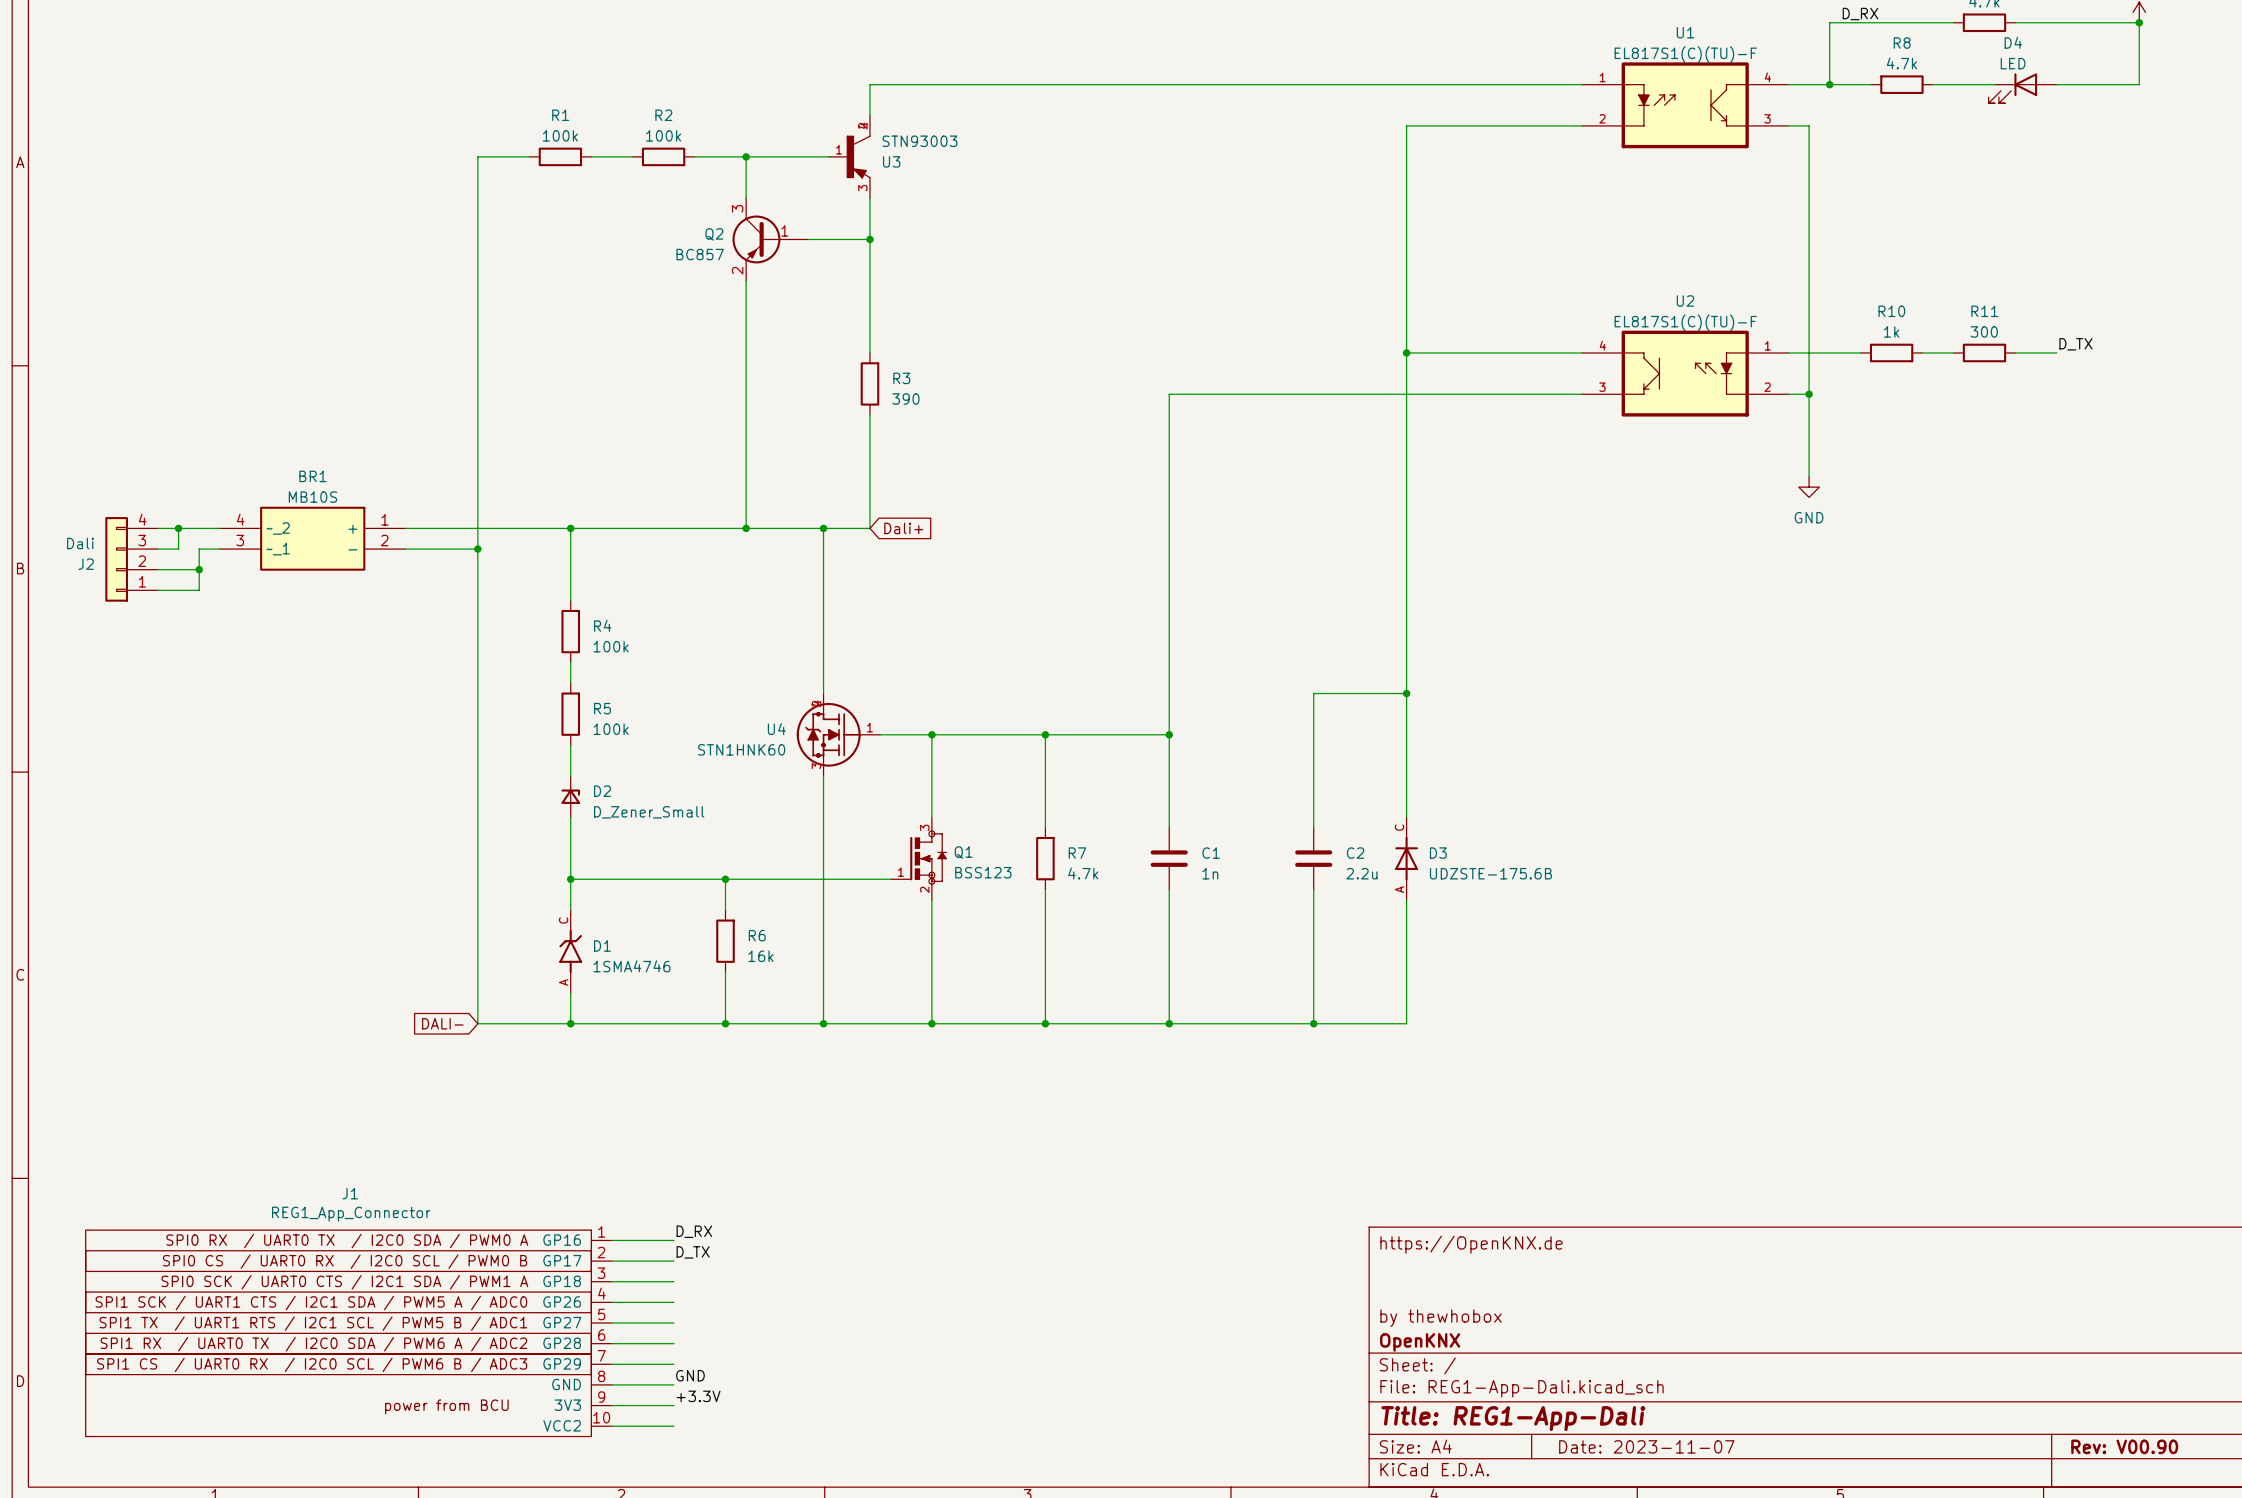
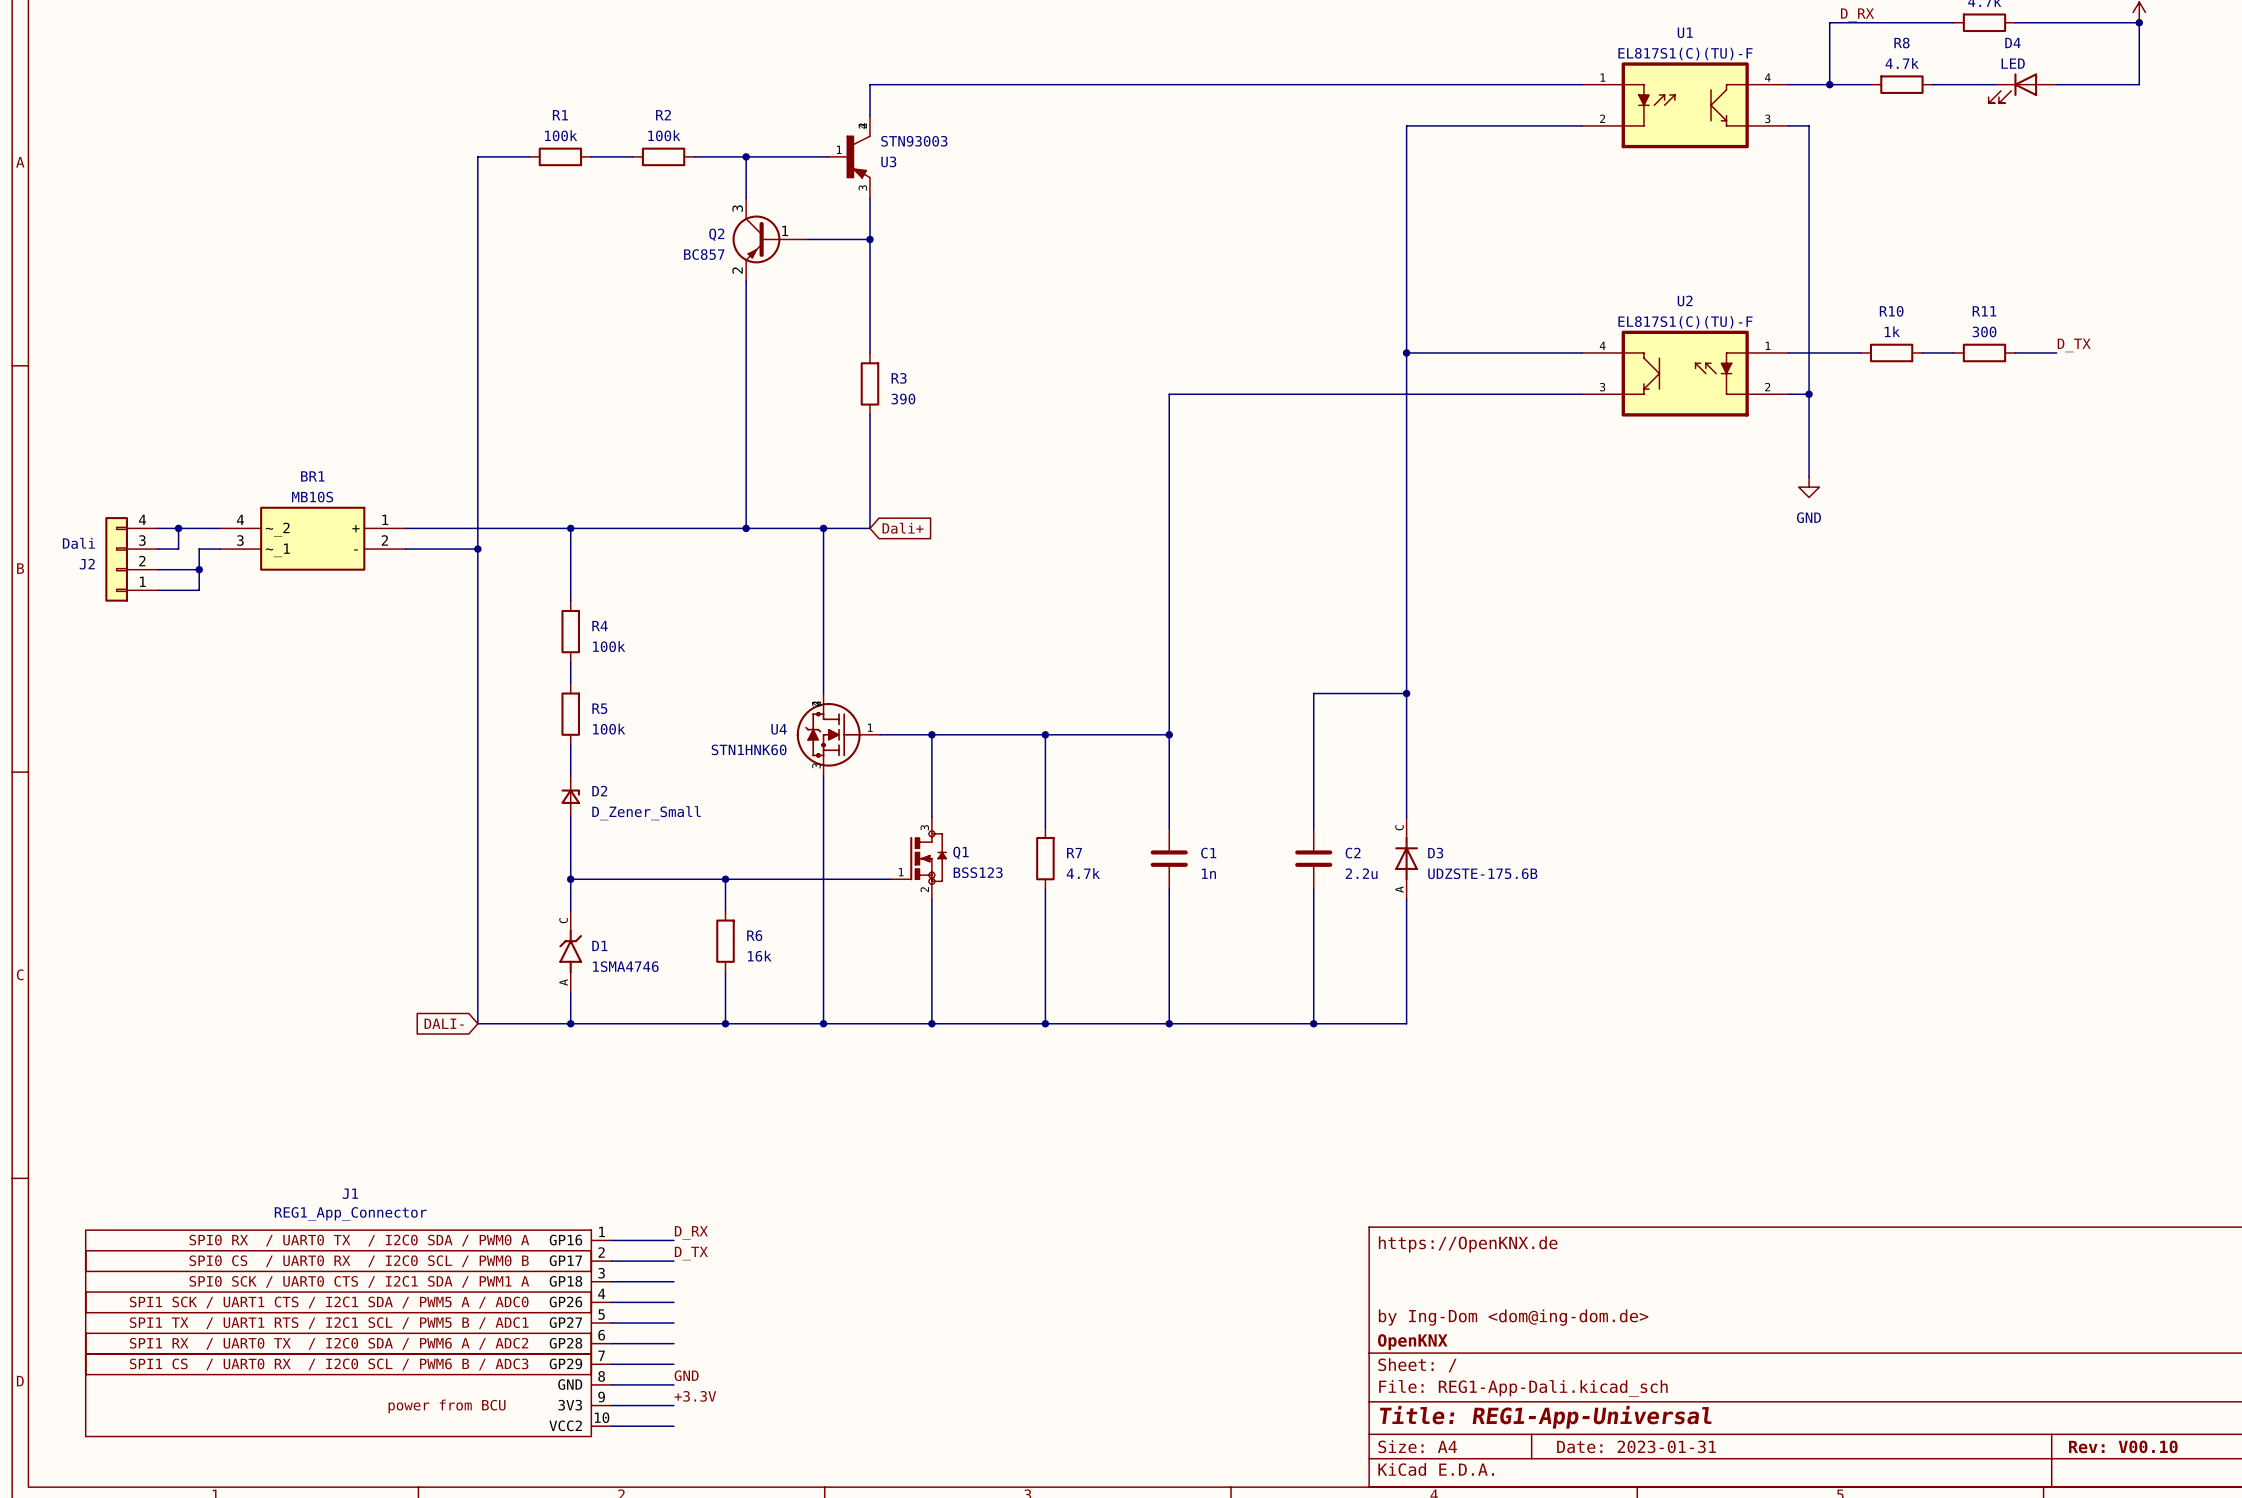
title block: by thewhobox (1441, 1318) -> by Ing-Dom <dom@ing-dom.de> (1513, 1317)
title block: Title: REG1-App-Dali (1513, 1418) -> Title: REG1-App-Universal (1545, 1417)
title block: Date: 2023-11-07 (1646, 1446) -> Date: 2023-01-31 (1636, 1446)
title block: Rev: V00.90 (2124, 1446) -> Rev: V00.10 (2123, 1446)

